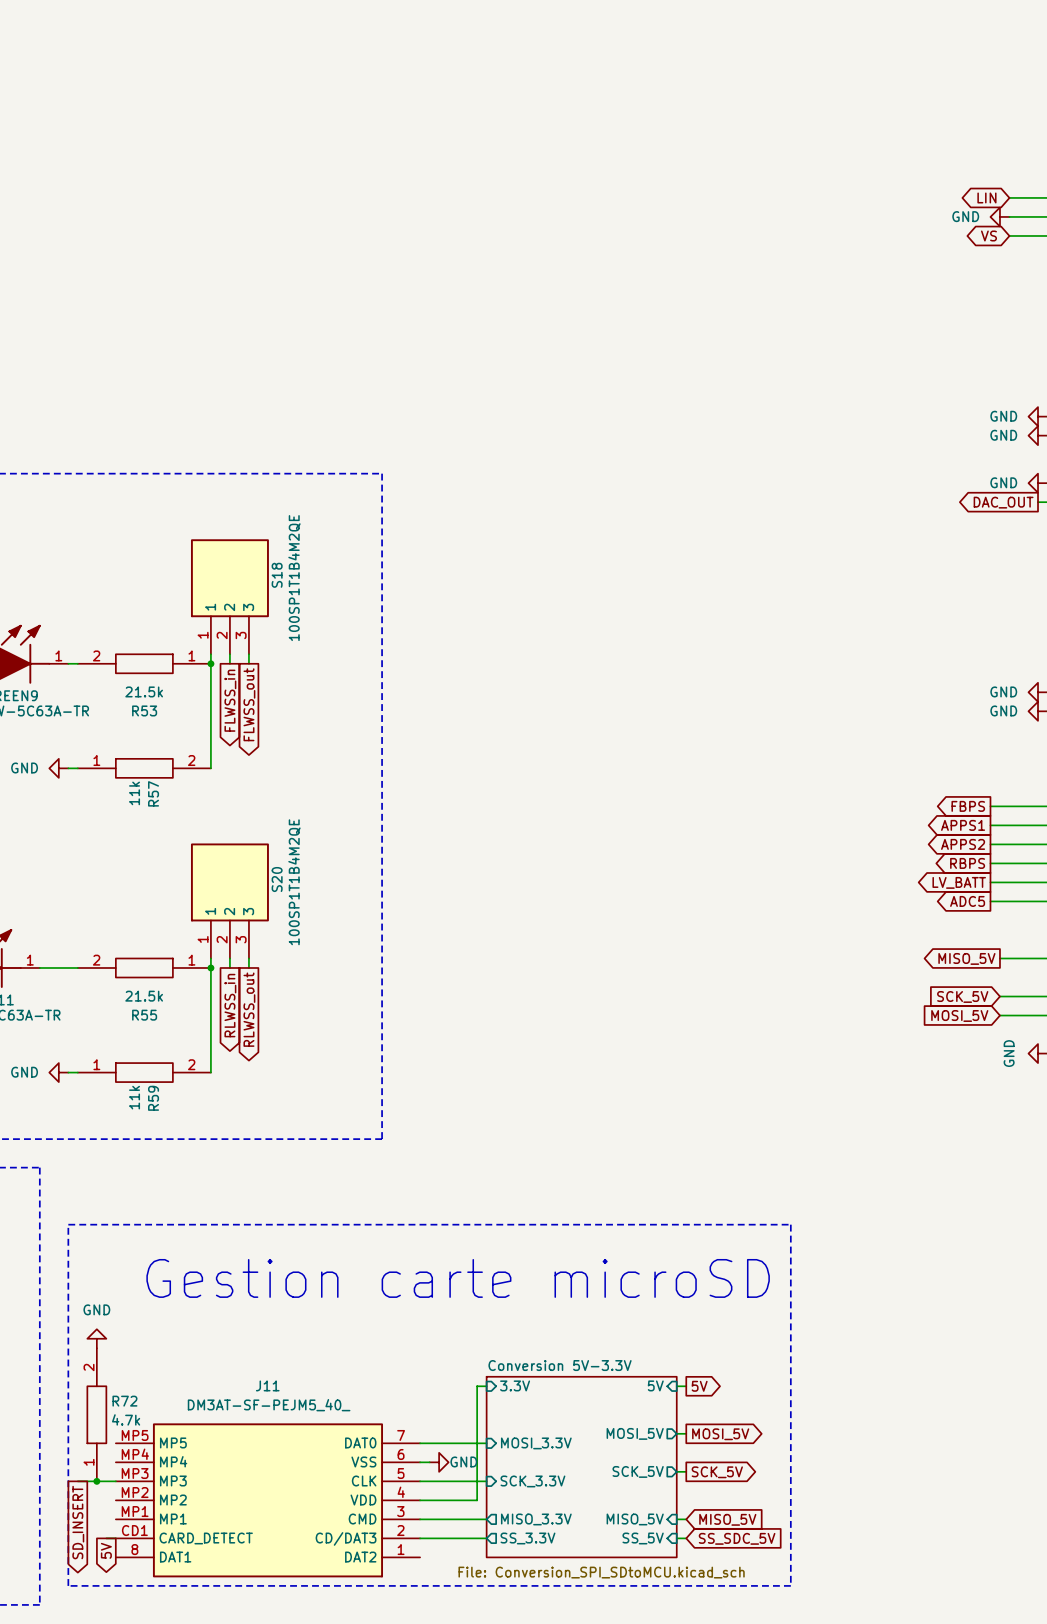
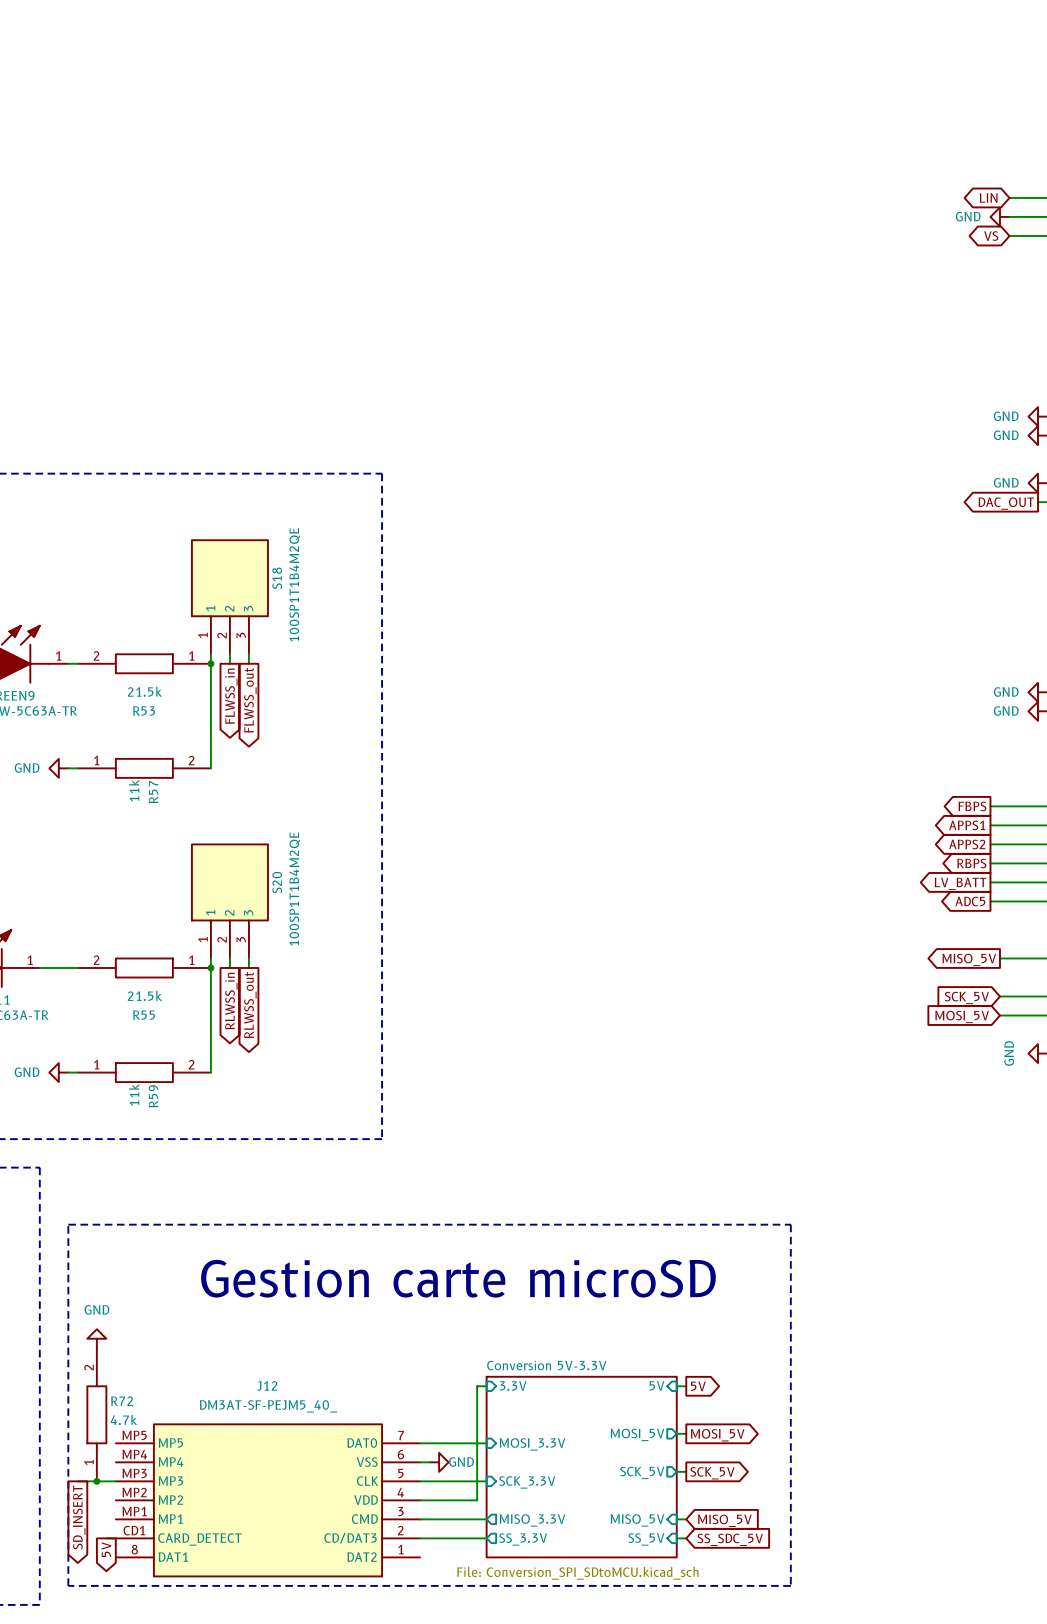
J11 name: J11 (267, 1385) -> J12 (267, 1385)

